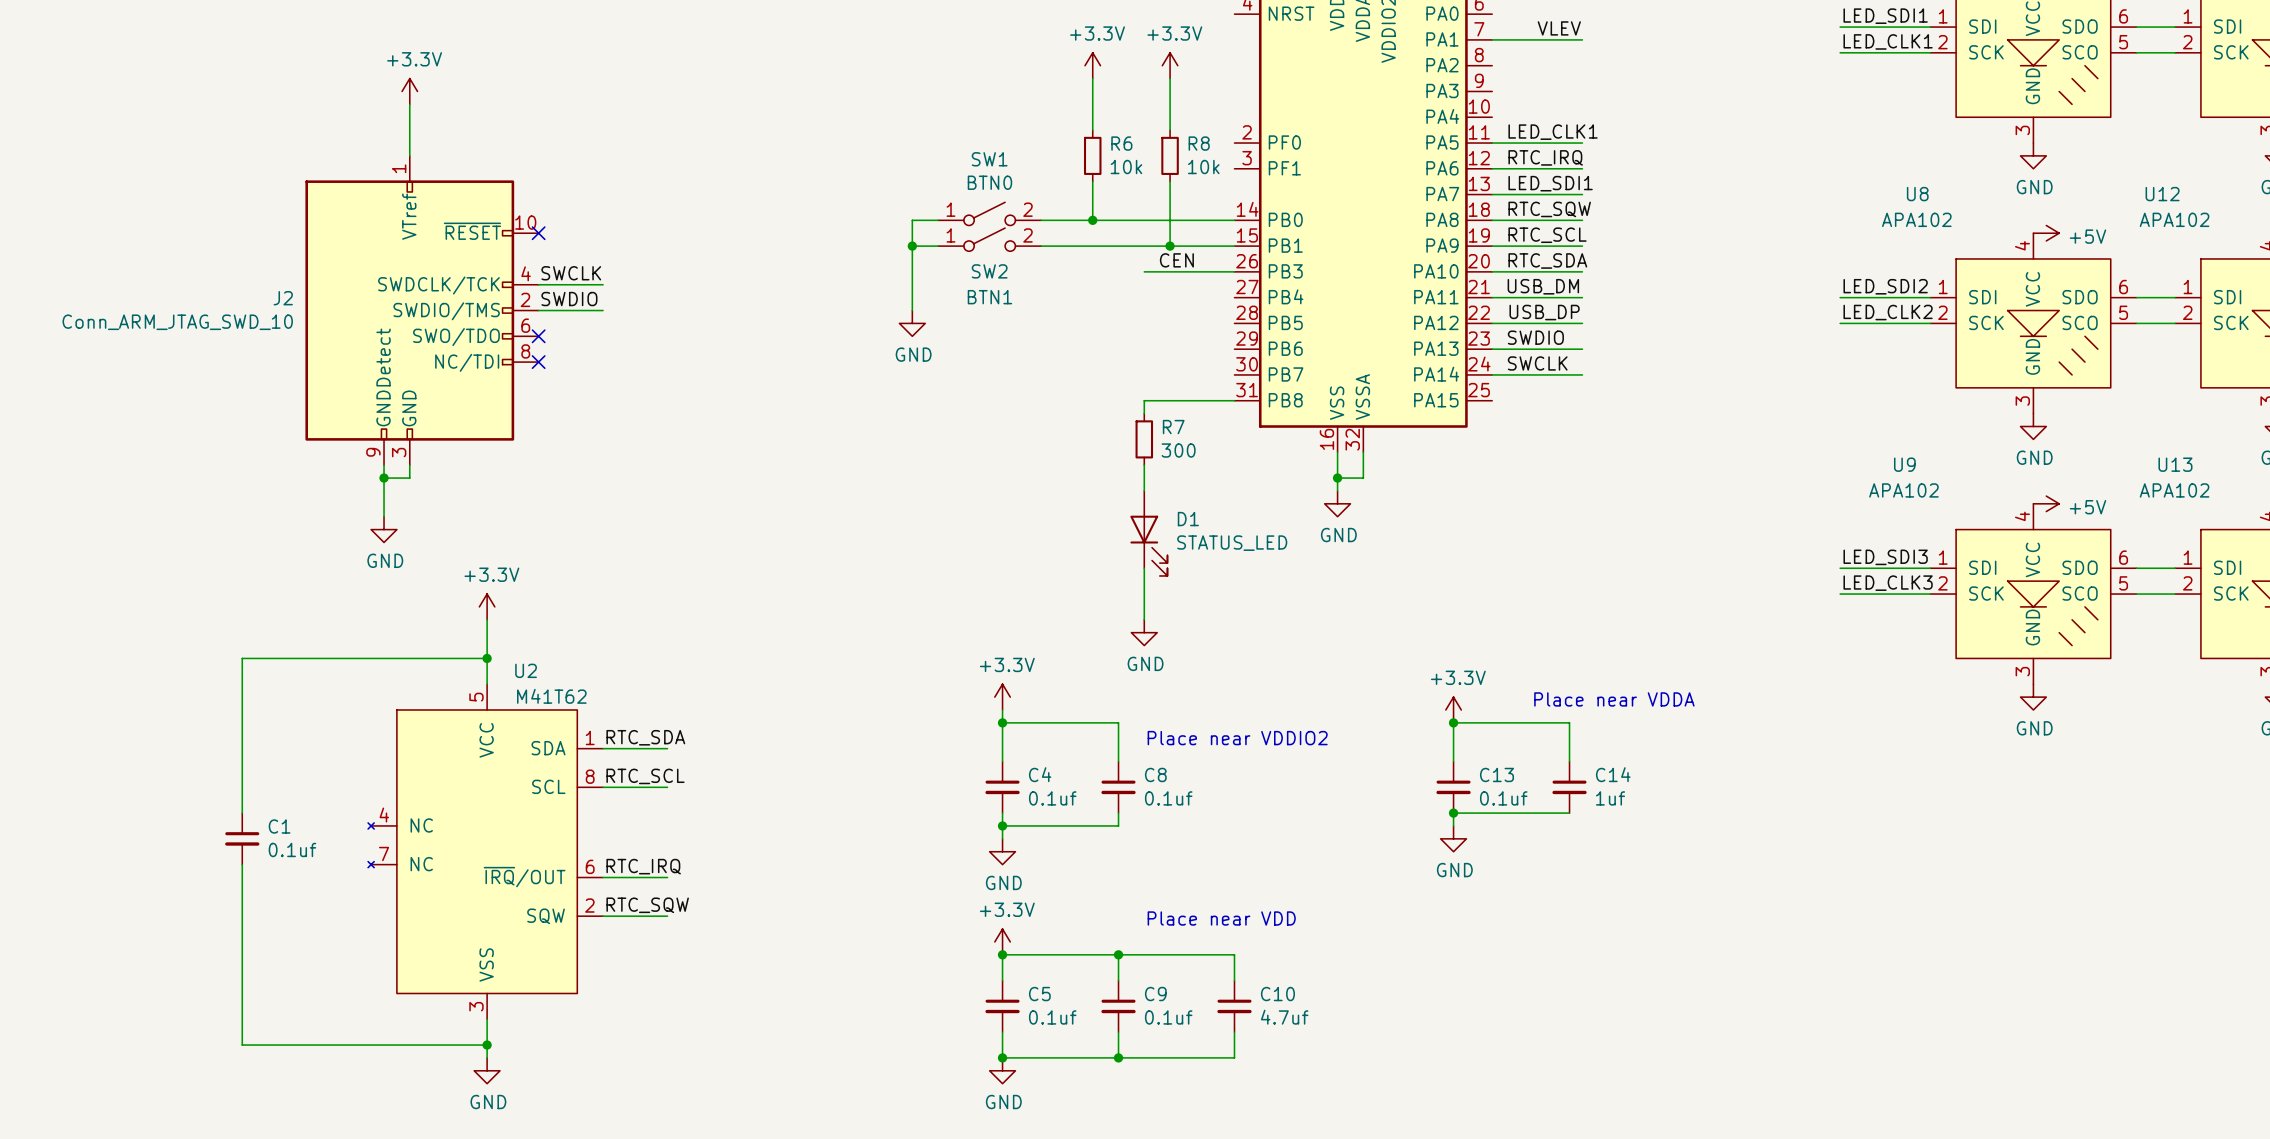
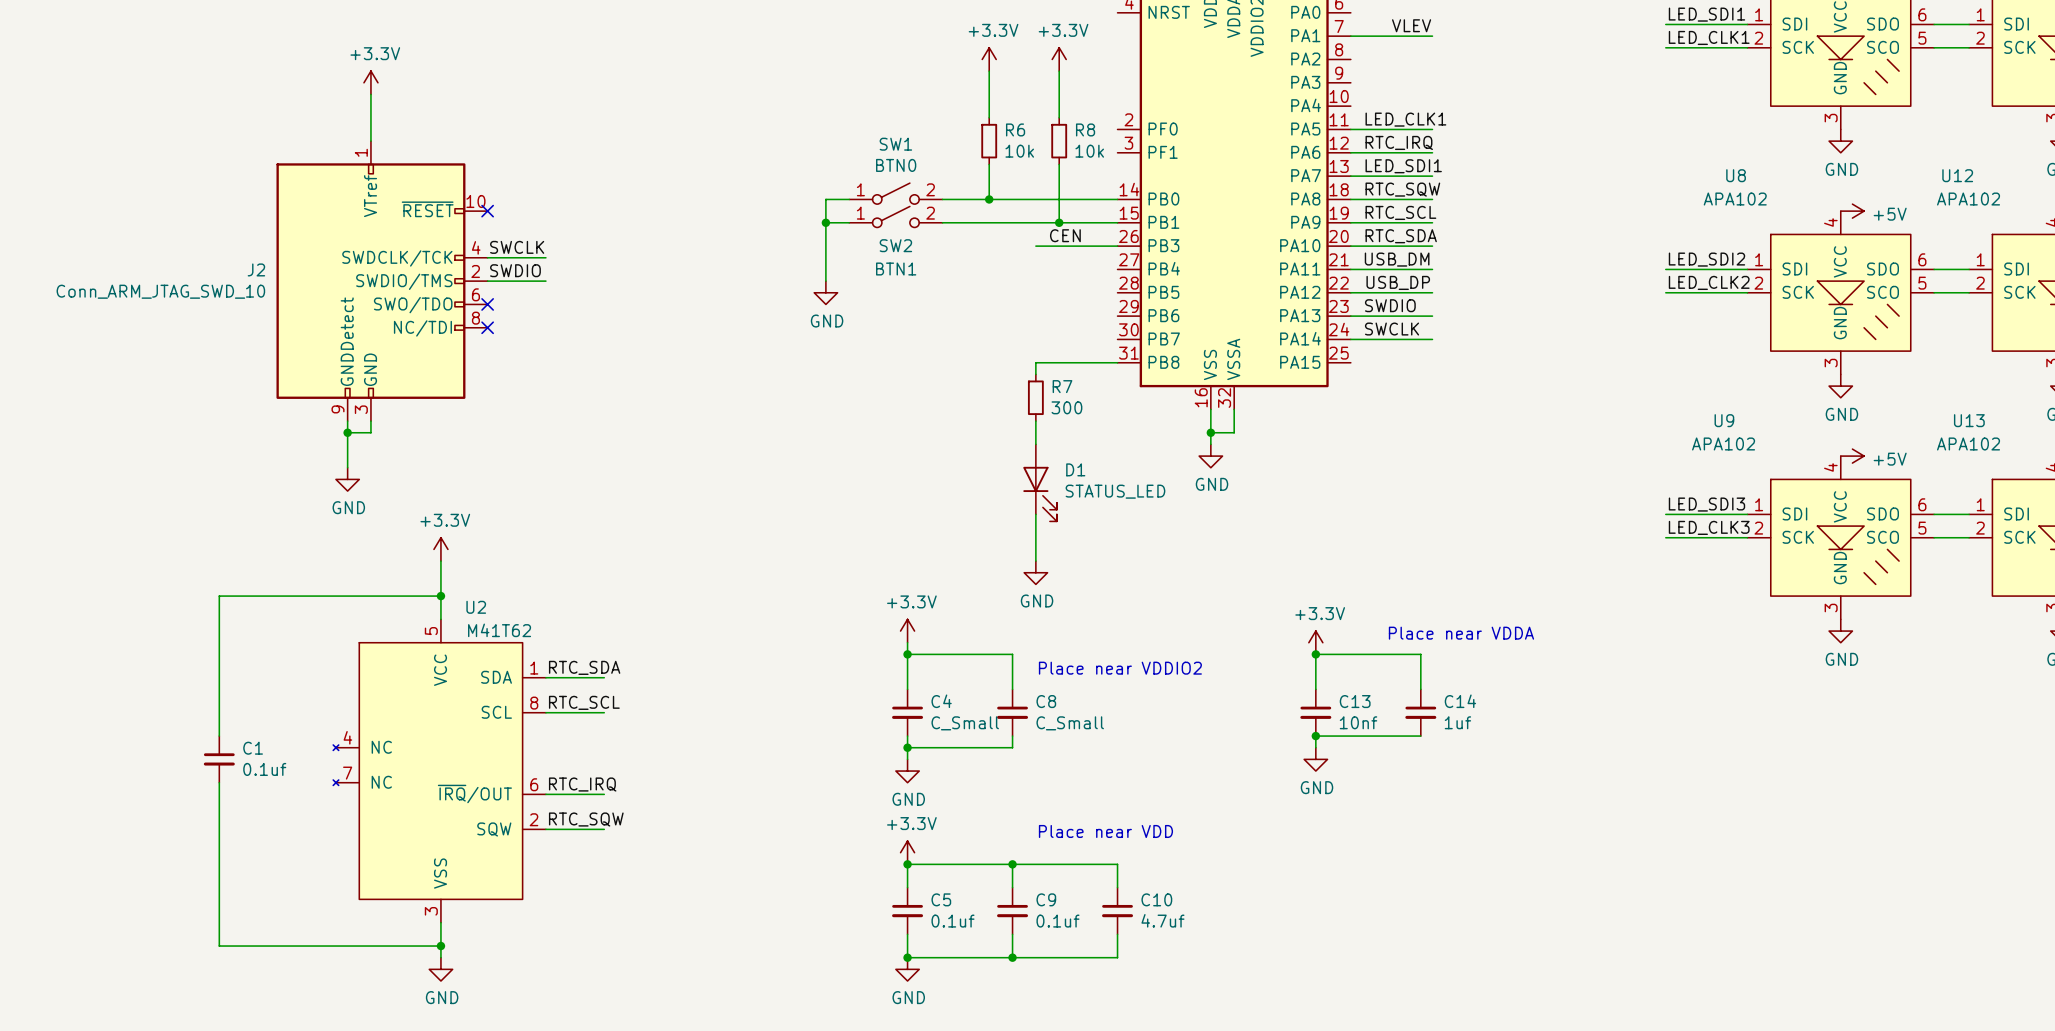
C4 value: 0.1uf (1052, 798) -> C_Small (965, 723)
C8 value: 0.1uf (1168, 798) -> C_Small (1070, 723)
C13 value: 0.1uf (1503, 798) -> 10nf (1358, 722)

